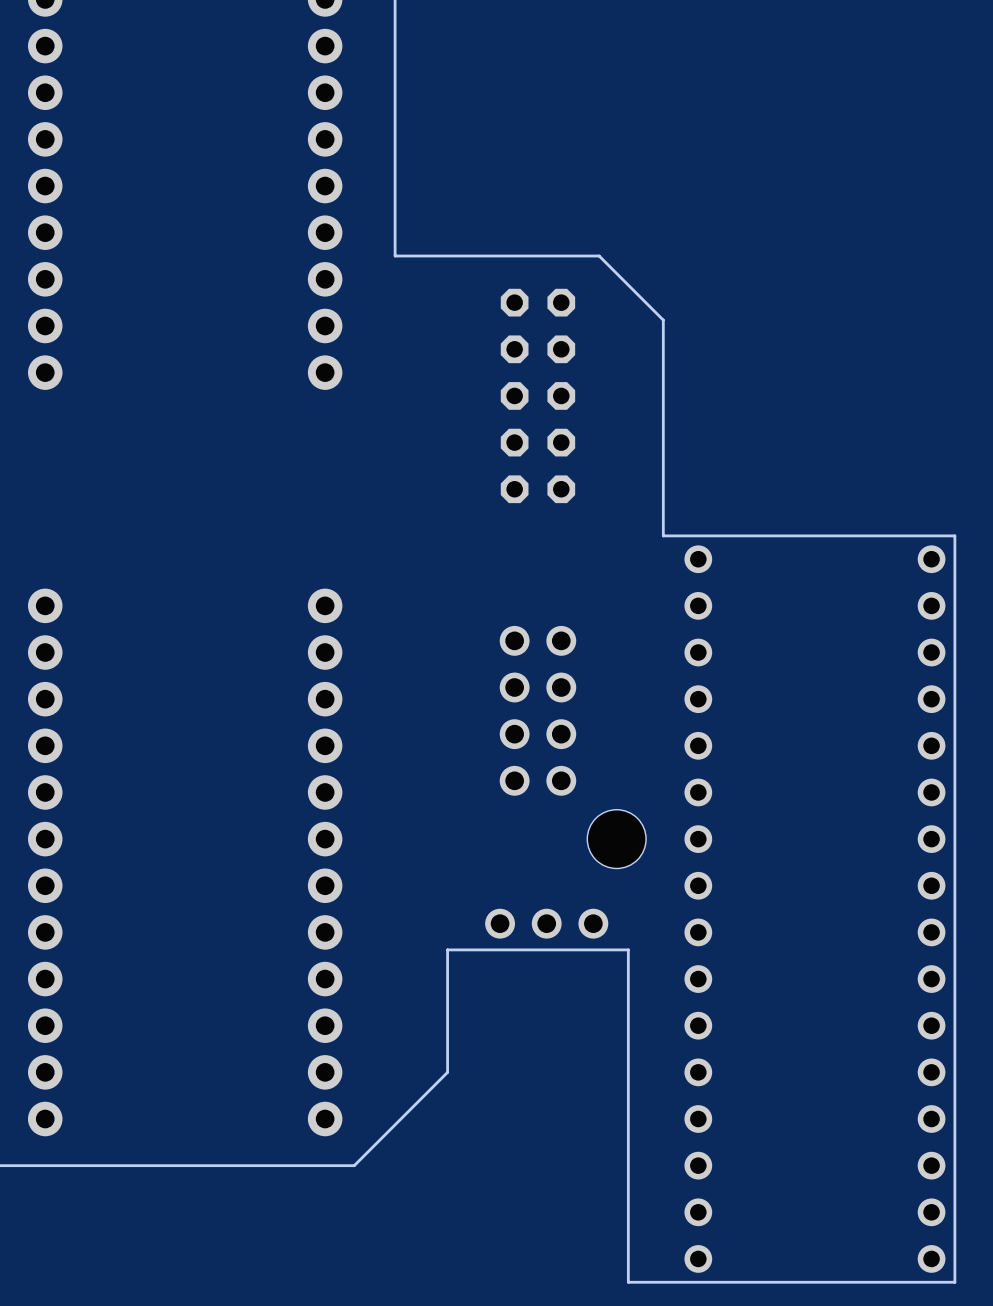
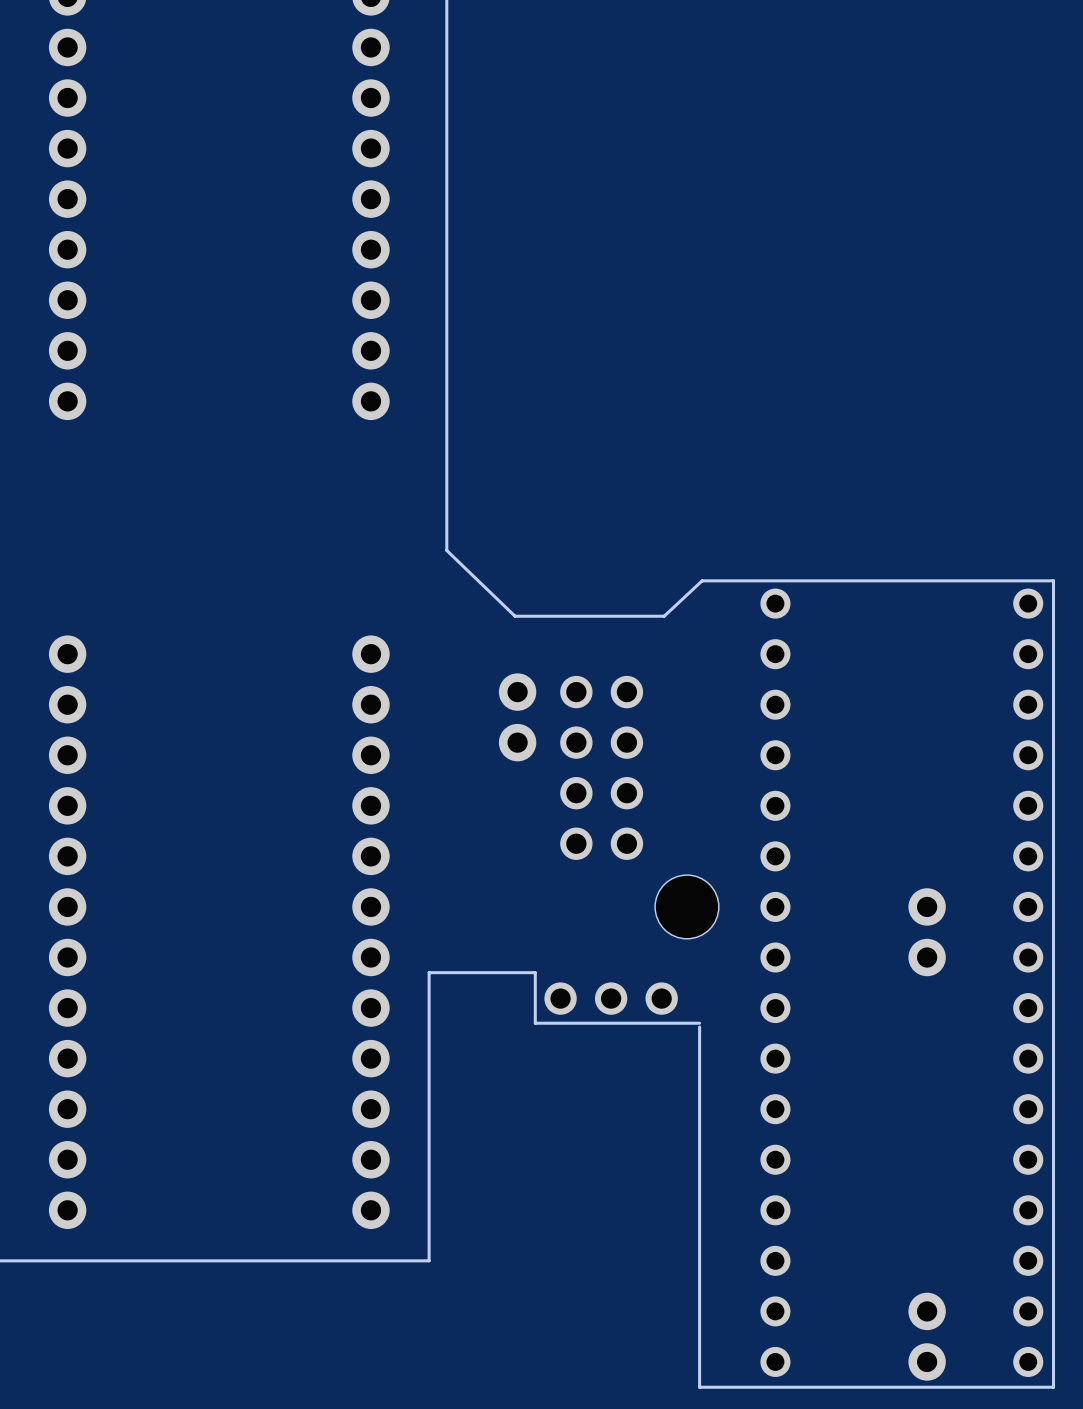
board edge: (395, 256) (599, 256) (663, 320) (663, 535) (954, 535) (954, 538) -> (446, 274) (446, 550) (515, 616) (664, 616) (702, 580) (1053, 580)
part: (537, 395) -> none
part: none -> (517, 717)
part: none -> (927, 932)
board edge: (628, 949) (447, 949) (447, 1072) (354, 1165) -> (699, 1023) (535, 1023) (535, 972) (429, 972) (429, 1260) (402, 1260)
part: none -> (927, 1336)

